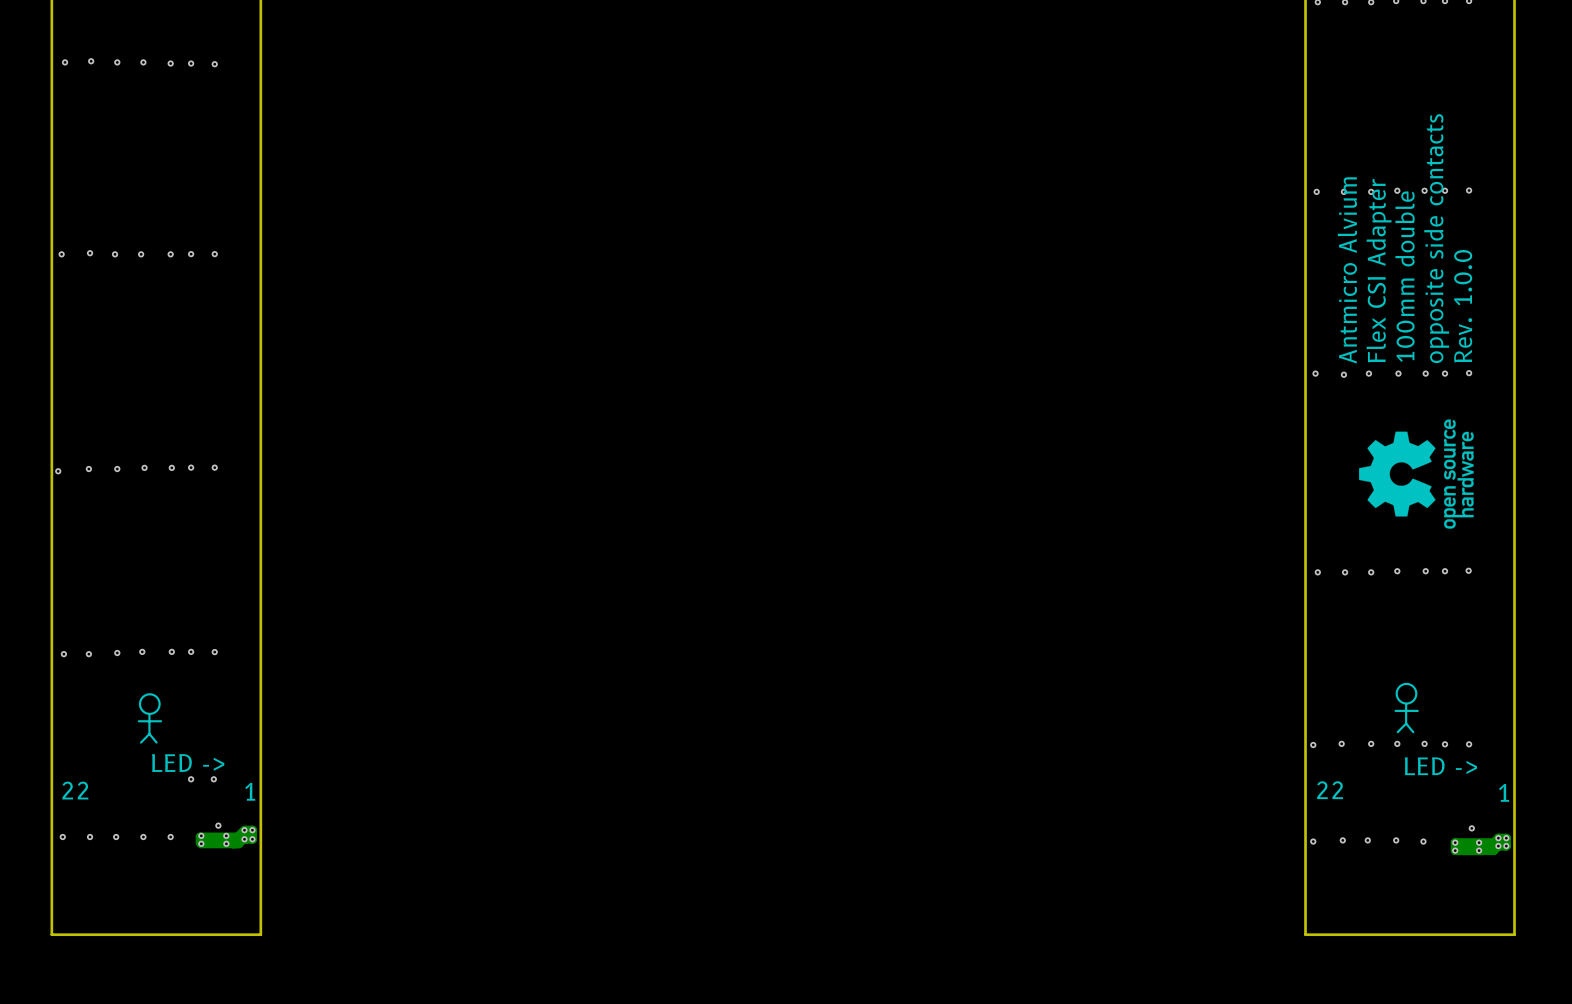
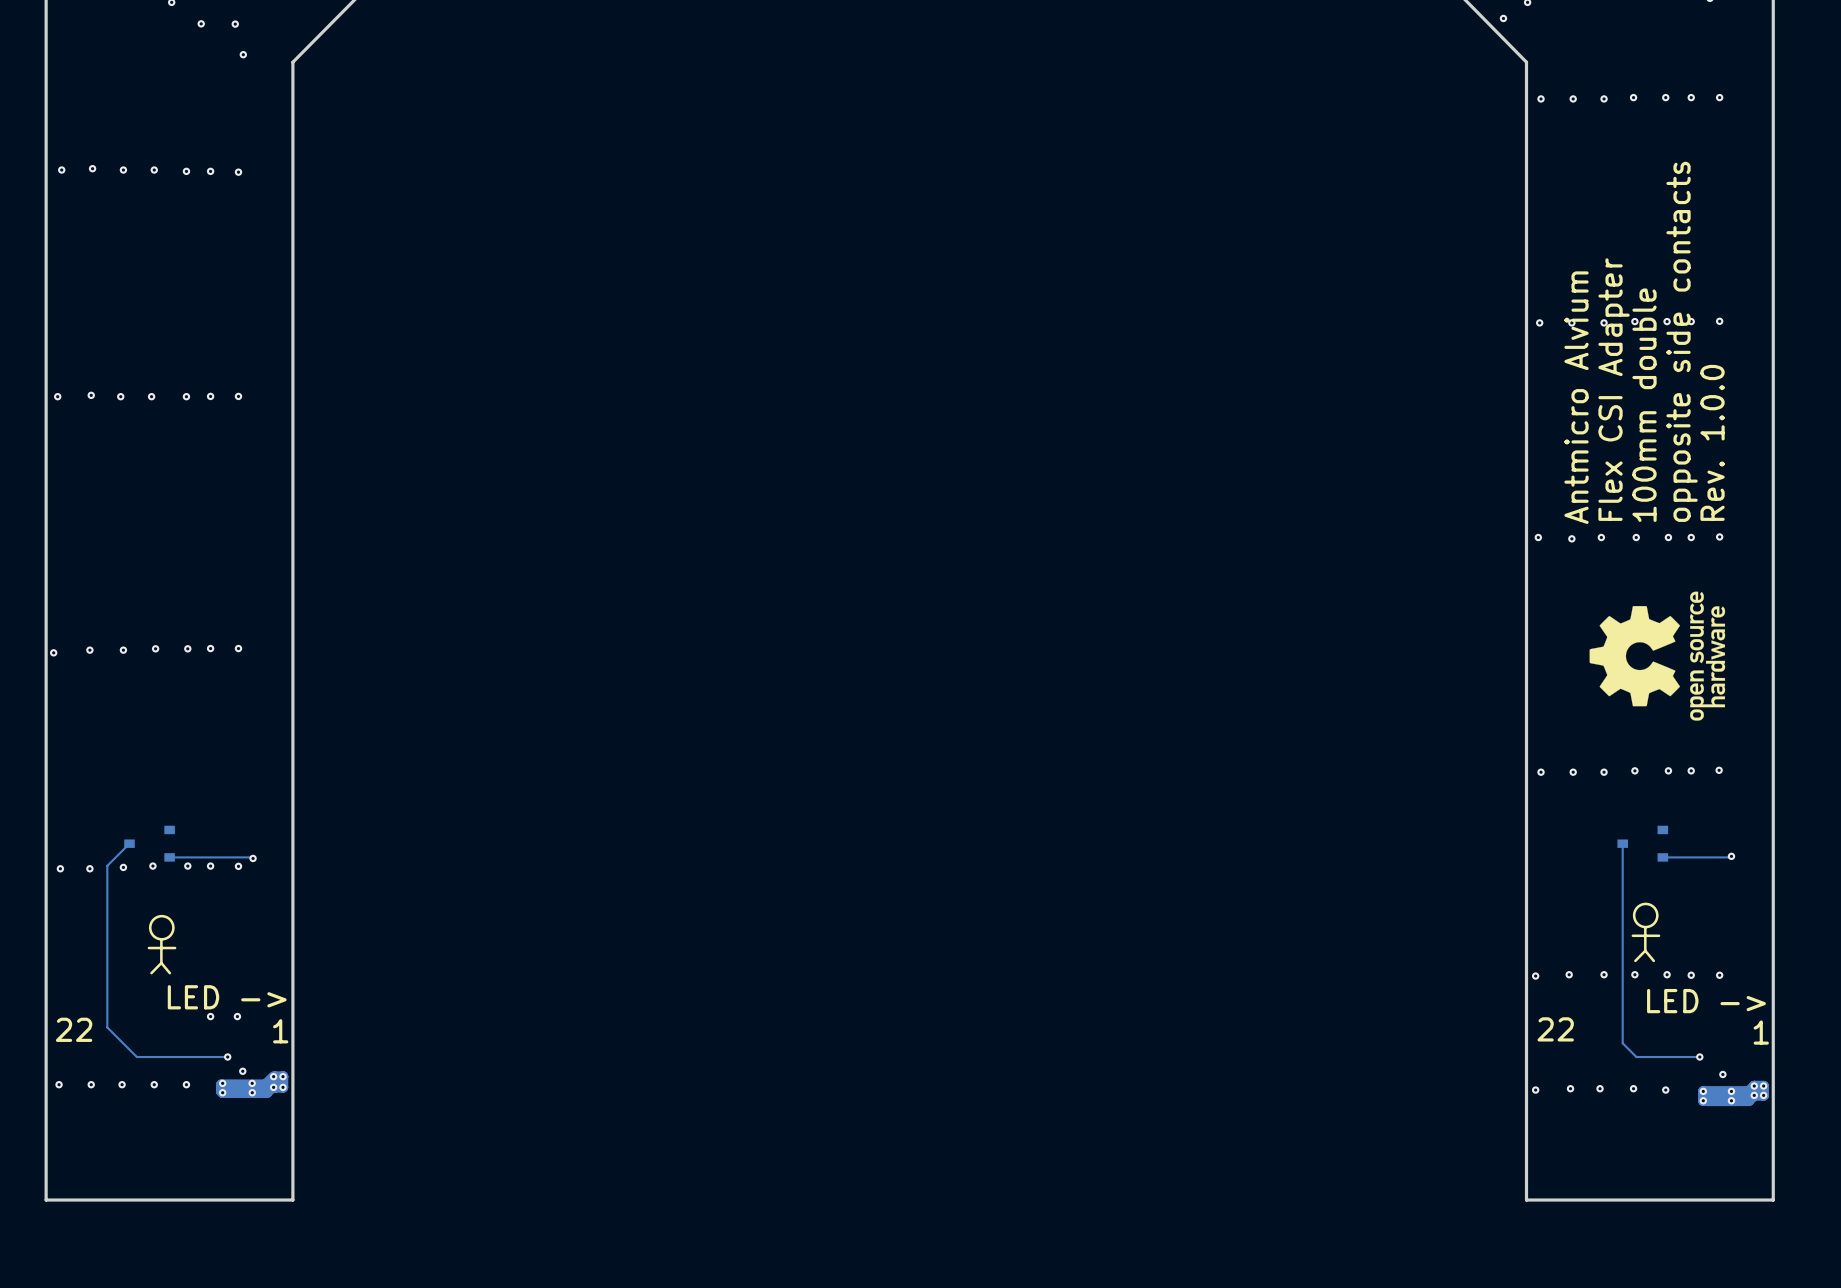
track: none -> (129, 843) (107, 865) (107, 1027) (136, 1057) (227, 1057)
part: none -> (149, 843)
track: none -> (1622, 843) (1622, 1043) (1636, 1057) (1699, 1057)
part: none -> (1642, 843)
track: none -> (1731, 856) (1662, 857)
via: none -> (1731, 856)
track: none -> (169, 857) (253, 858)
via: none -> (253, 858)
via: none -> (227, 1057)
via: none -> (1699, 1057)

